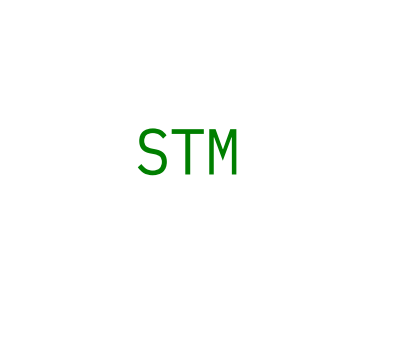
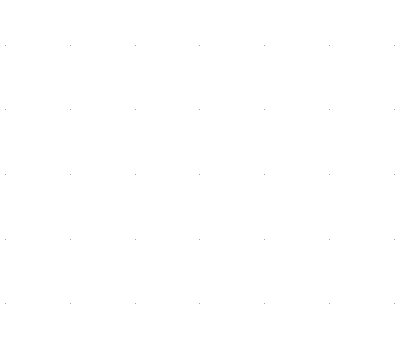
text: STM (187, 151) -> none

